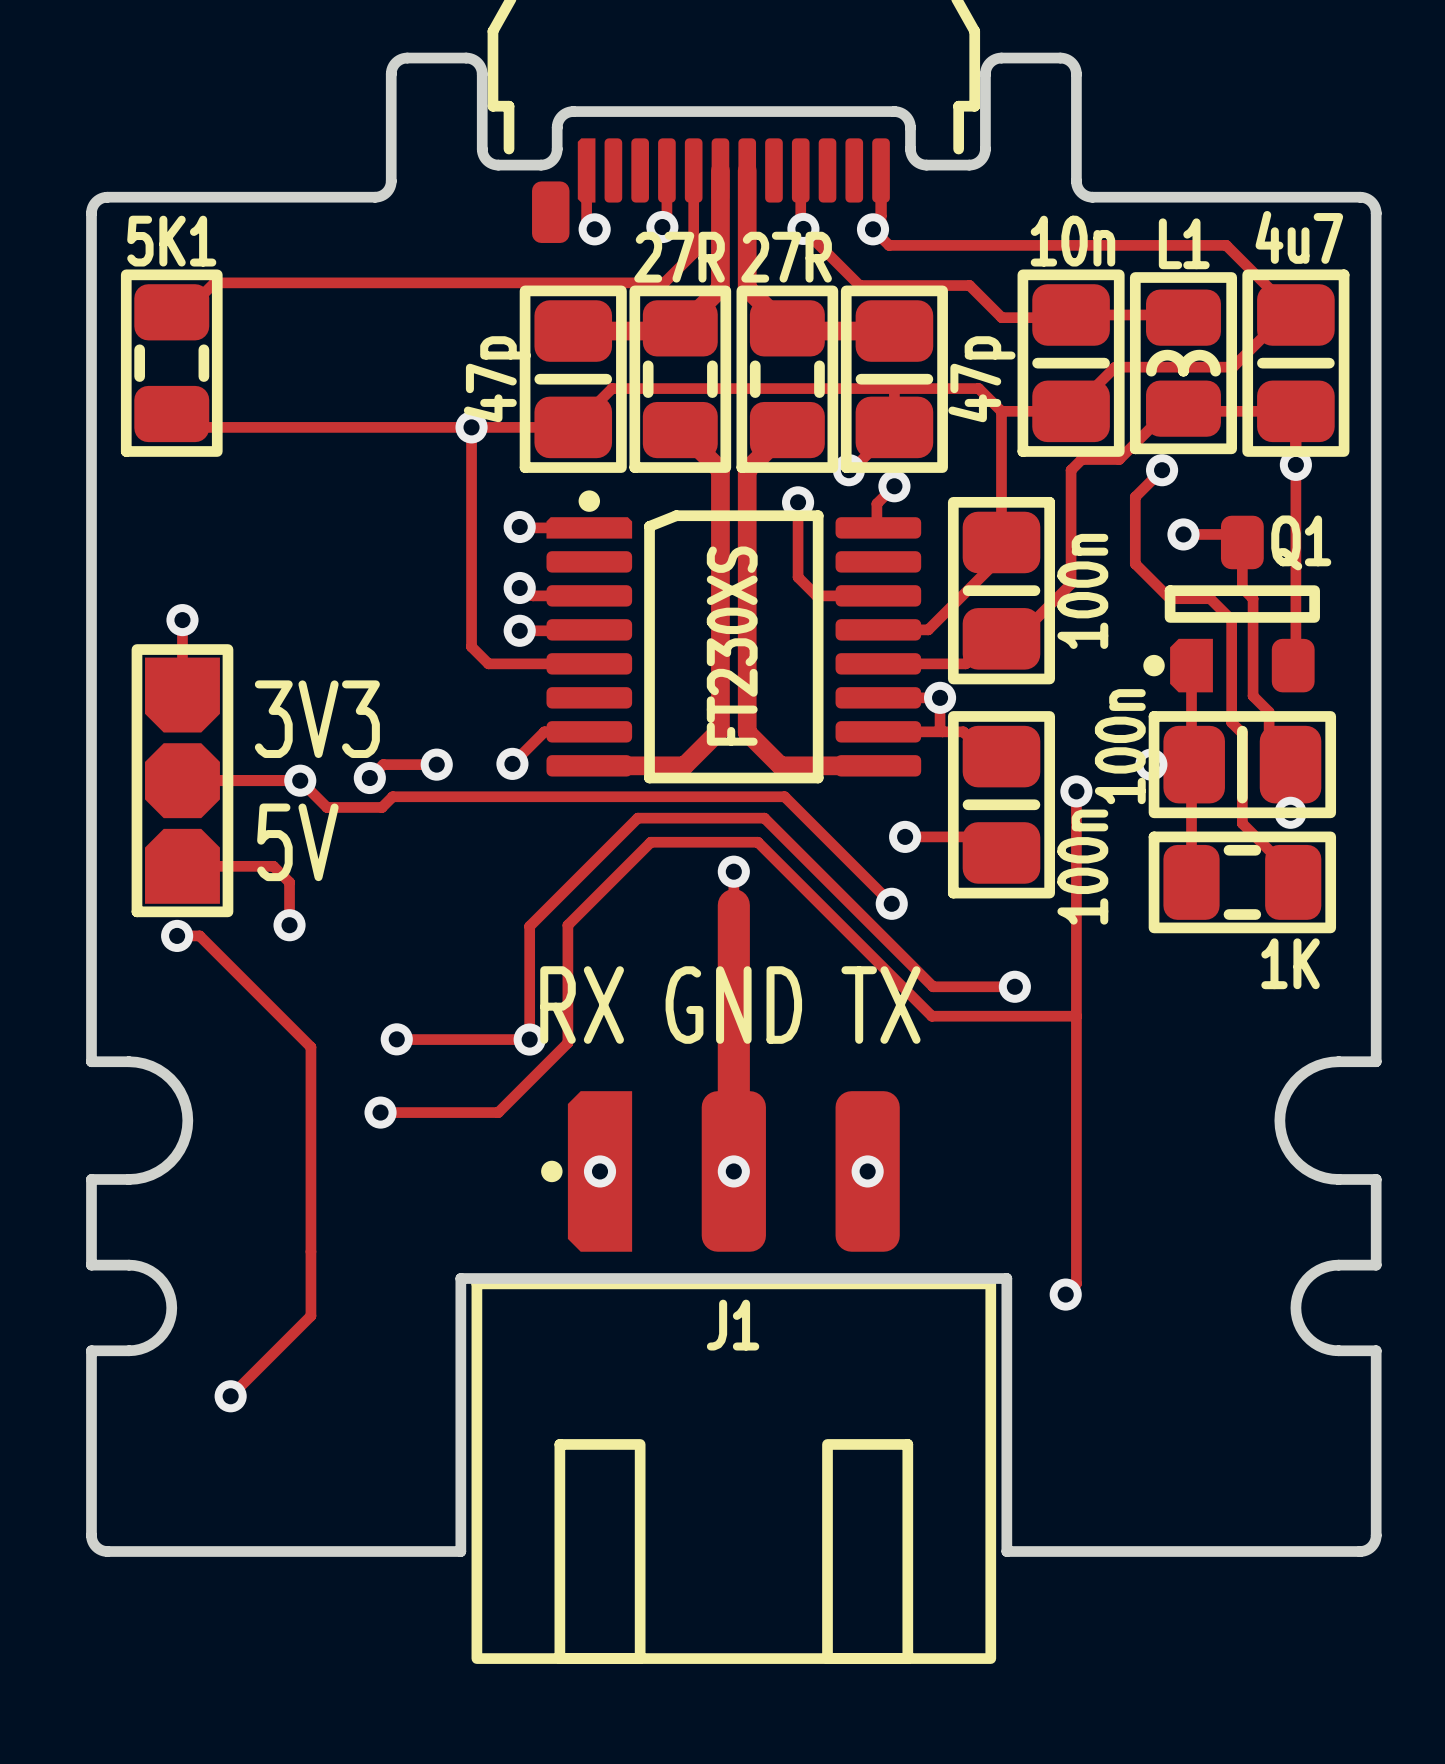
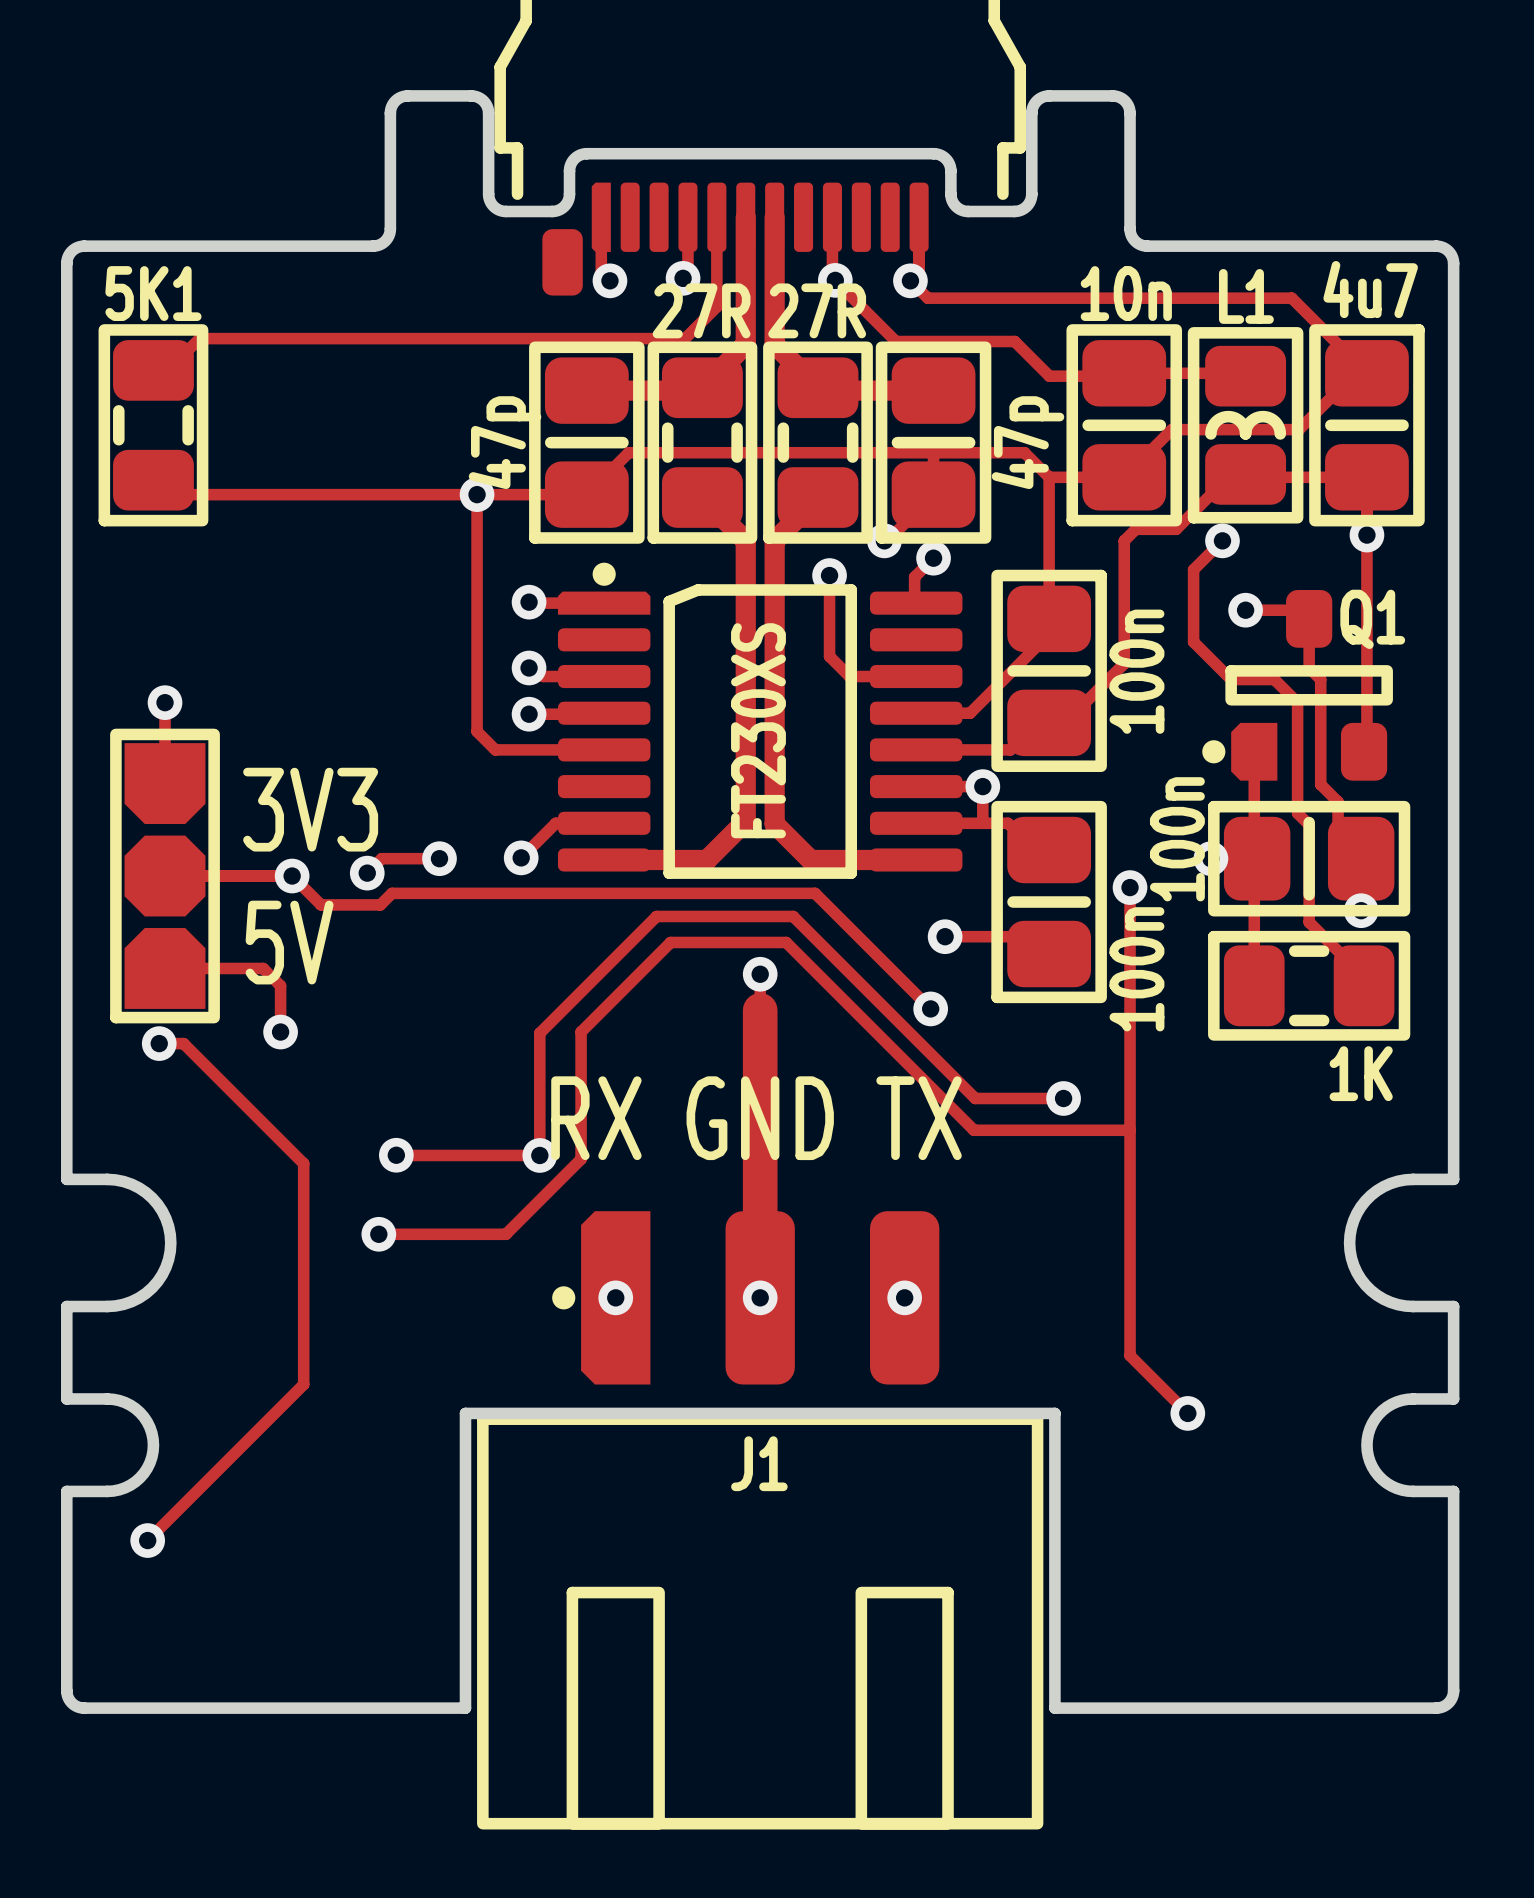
track: (1076, 1224) (1076, 1283) (1065, 1294) -> (1130, 1355) (1187, 1413)
track: (310, 1251) (310, 1315) (230, 1396) -> (303, 1384) (147, 1540)
via position: (1065, 1294) -> (1187, 1413)
via position: (230, 1396) -> (147, 1540)

